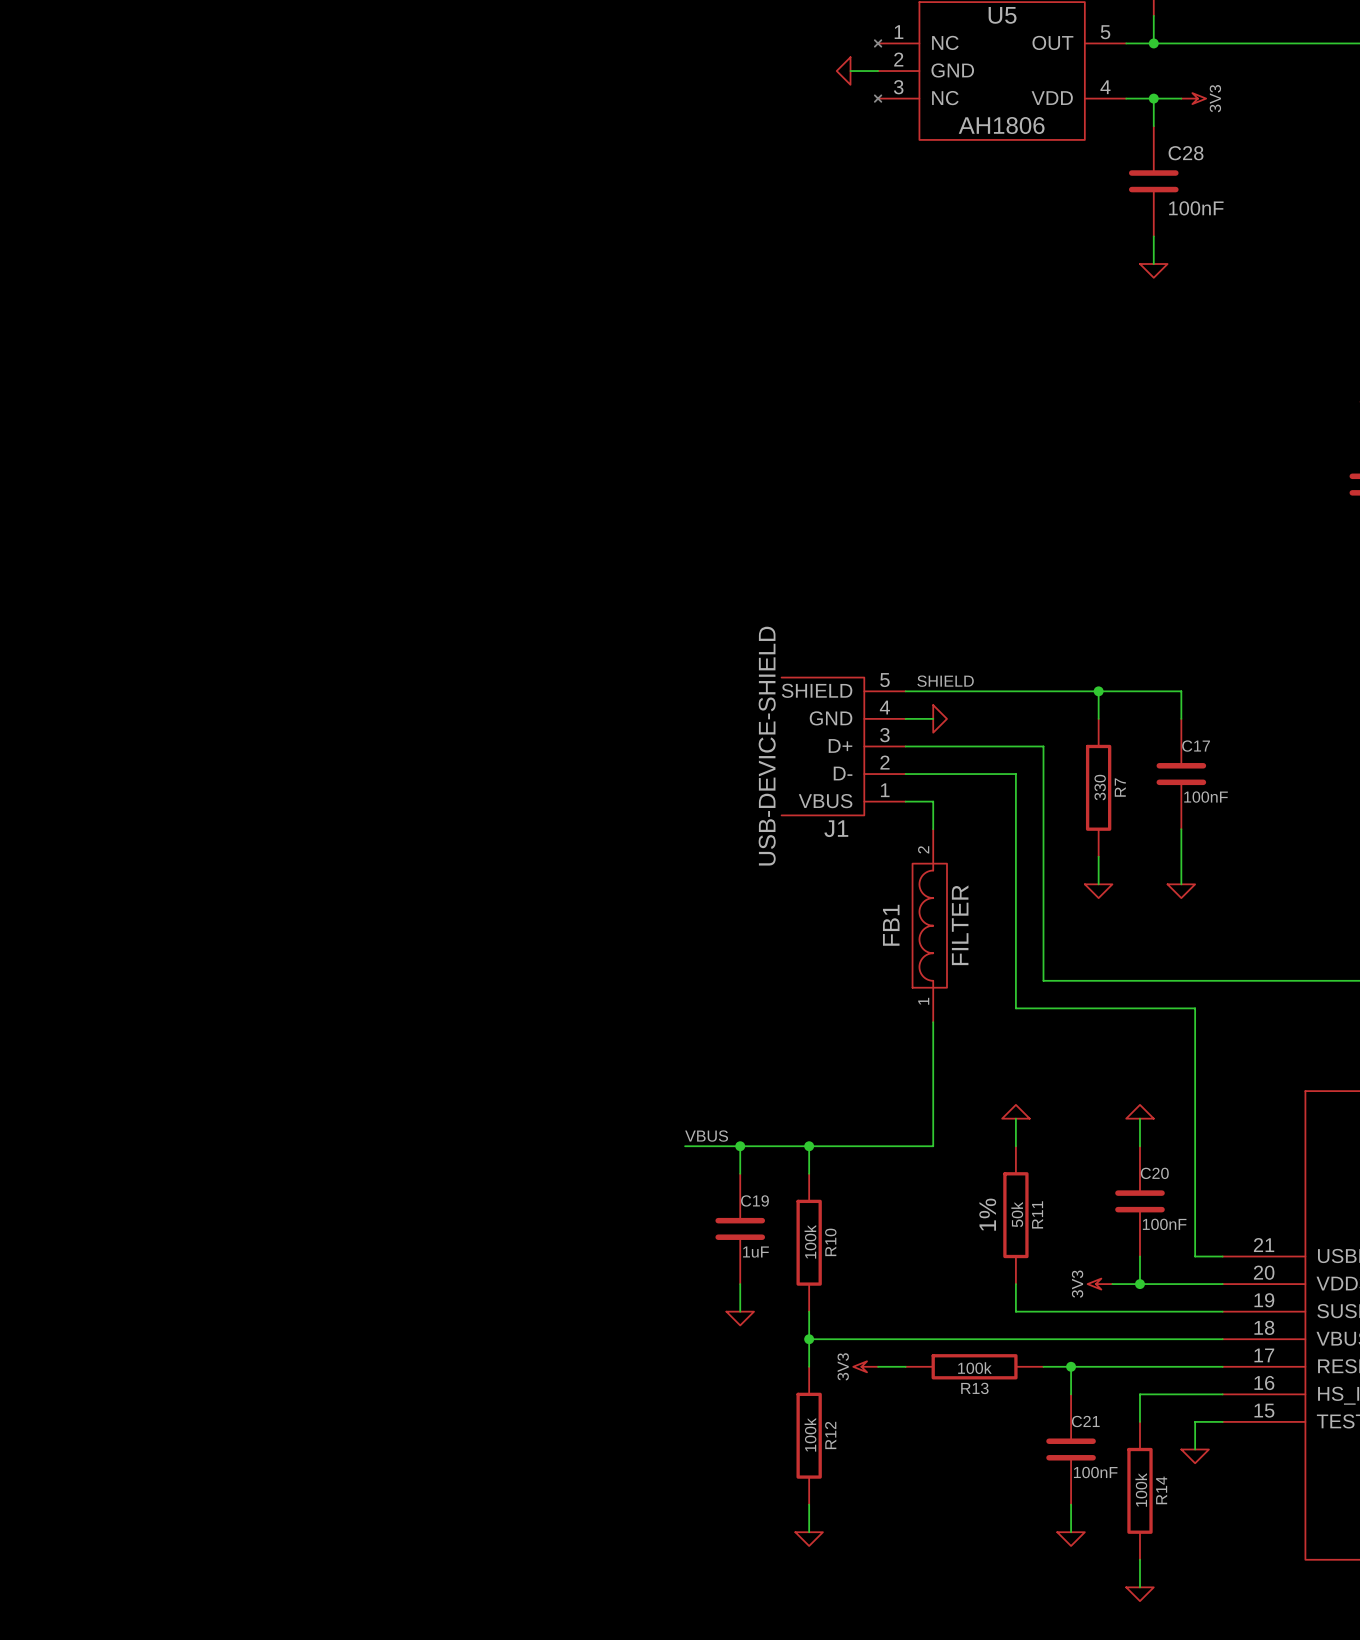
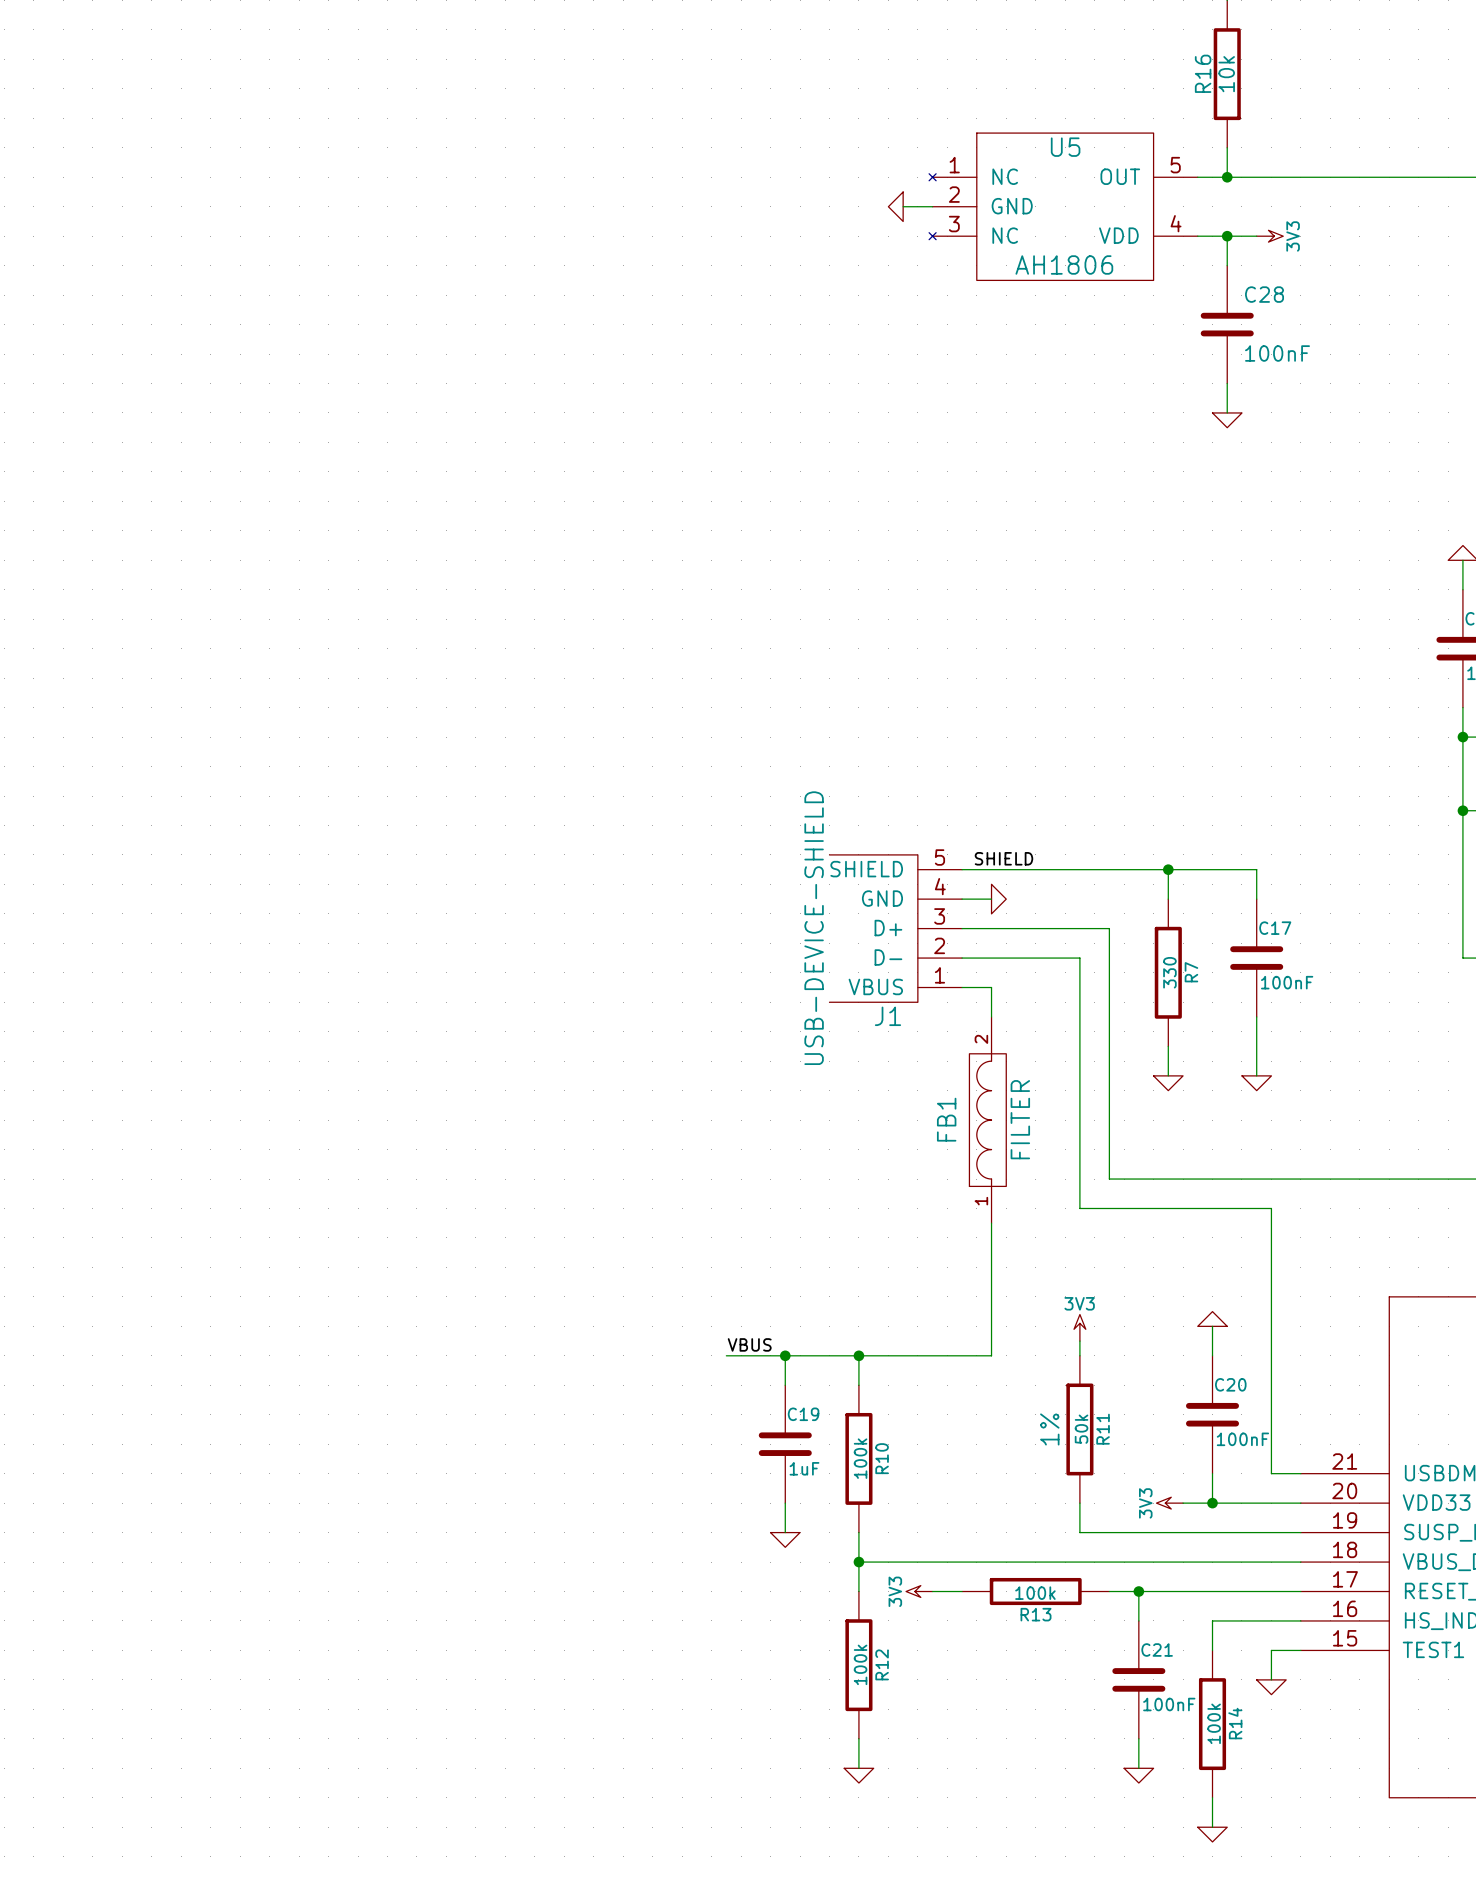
power symbol text: none -> 3V3 (1079, 1303)
power symbol shape: [1002, 1104, 1030, 1119] -> [1074, 1314, 1086, 1342]

